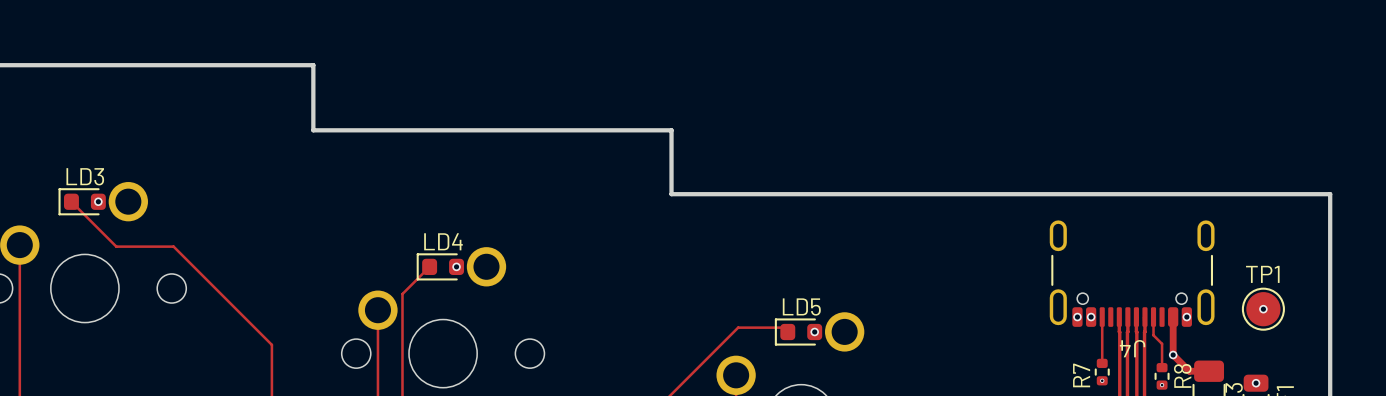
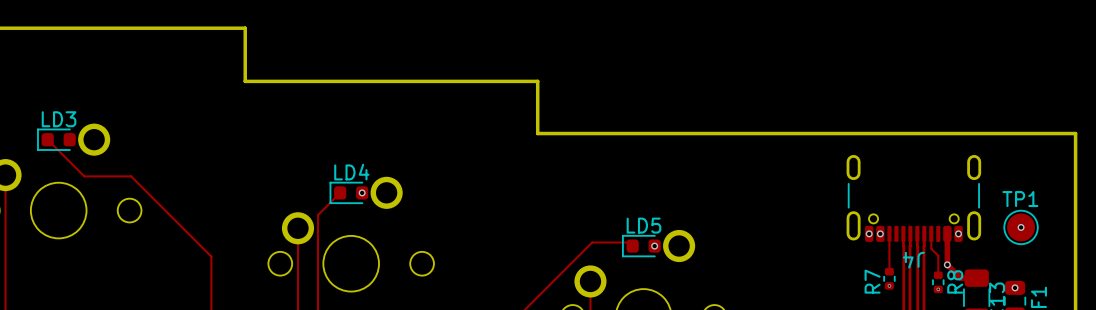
via: (98, 201) -> none

